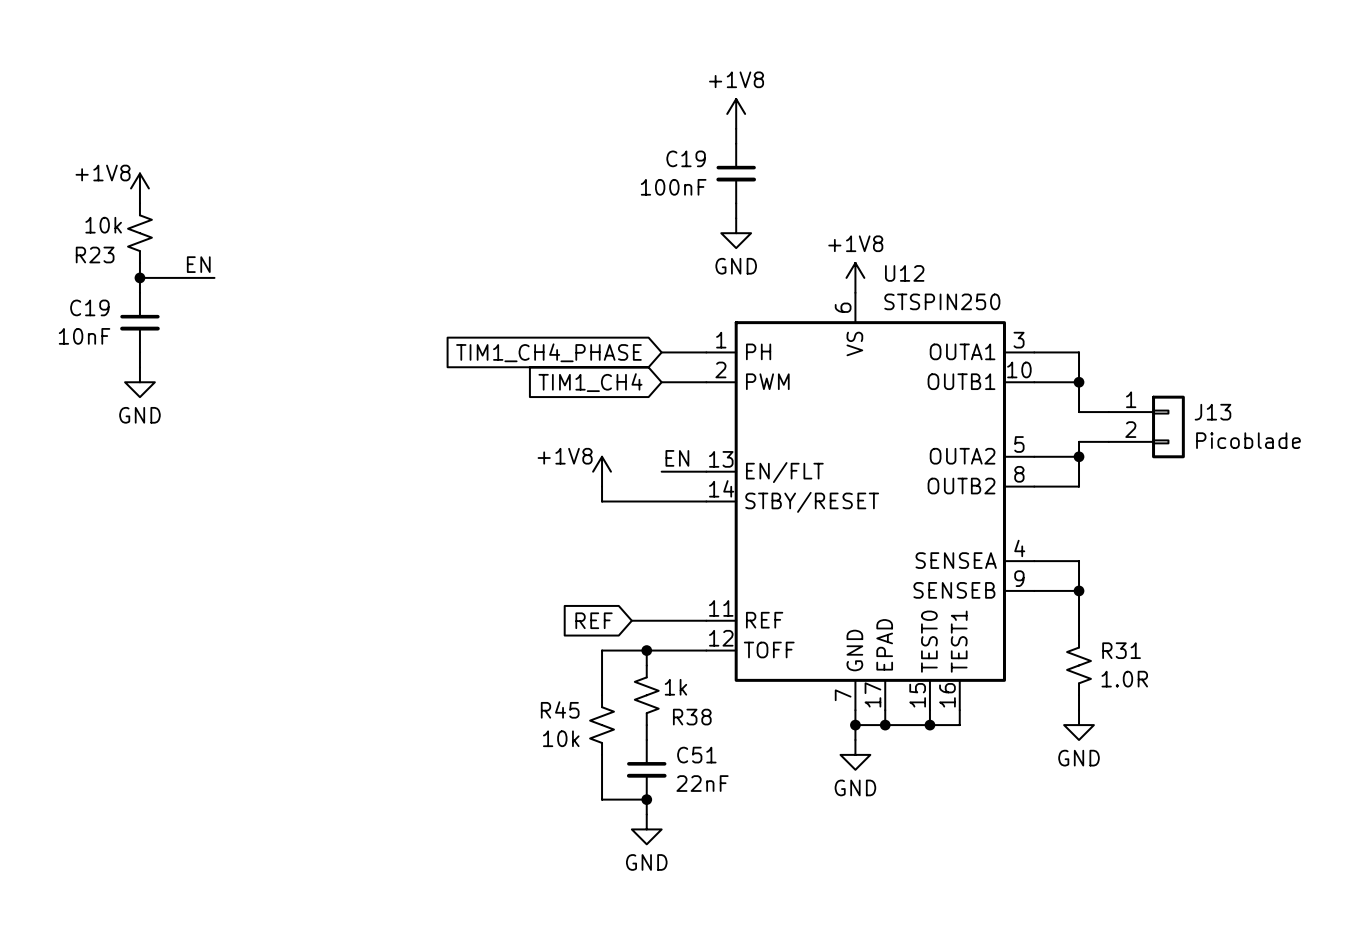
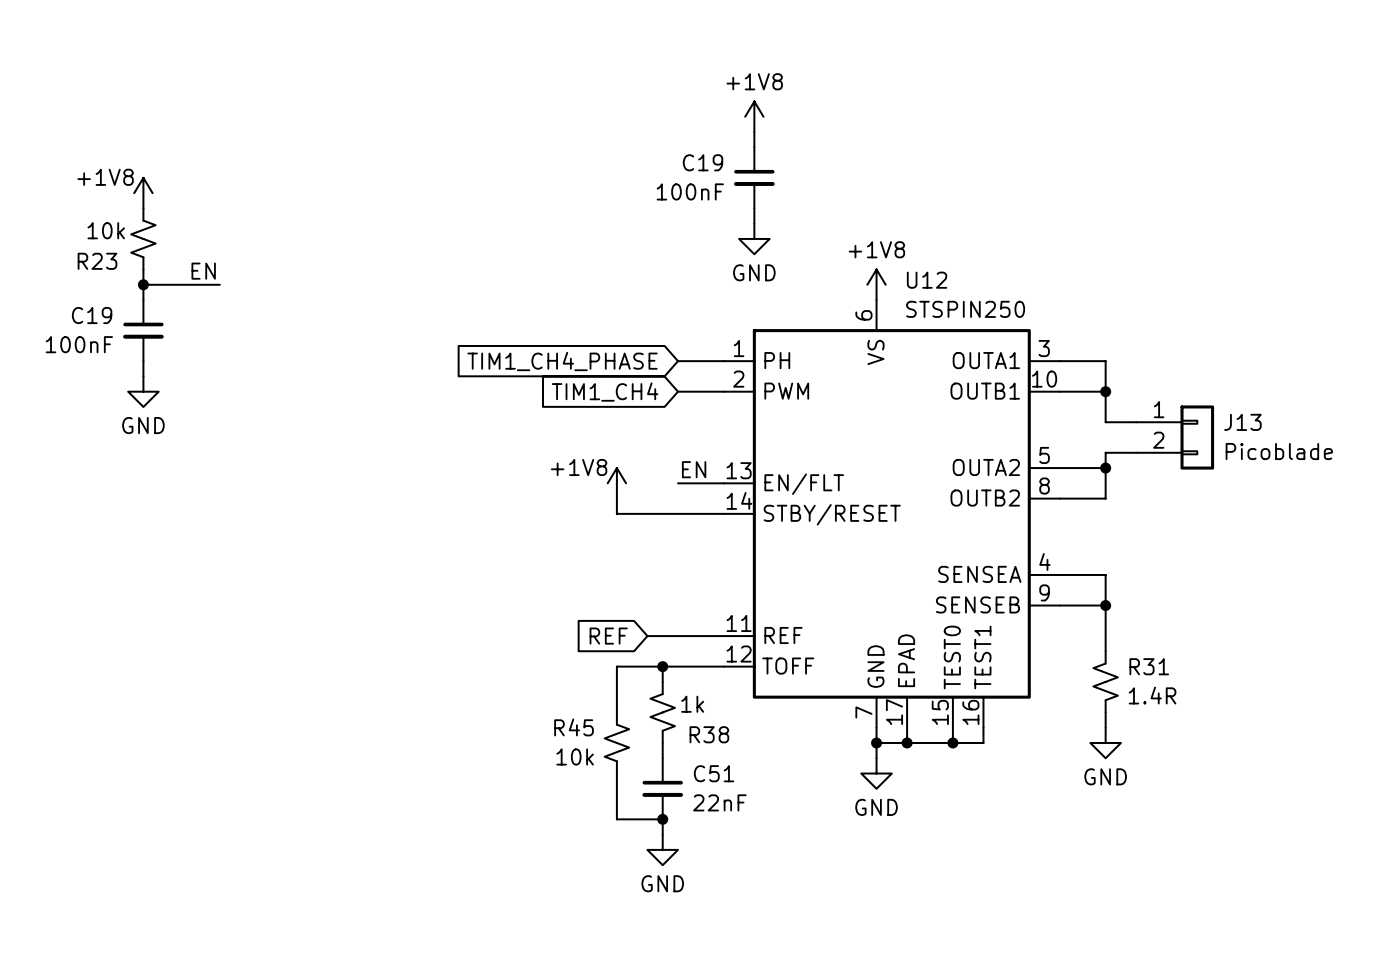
C19 value: 10nF (84, 336) -> 100nF (79, 344)
R31 value: 1.0R (1124, 679) -> 1.4R (1152, 695)

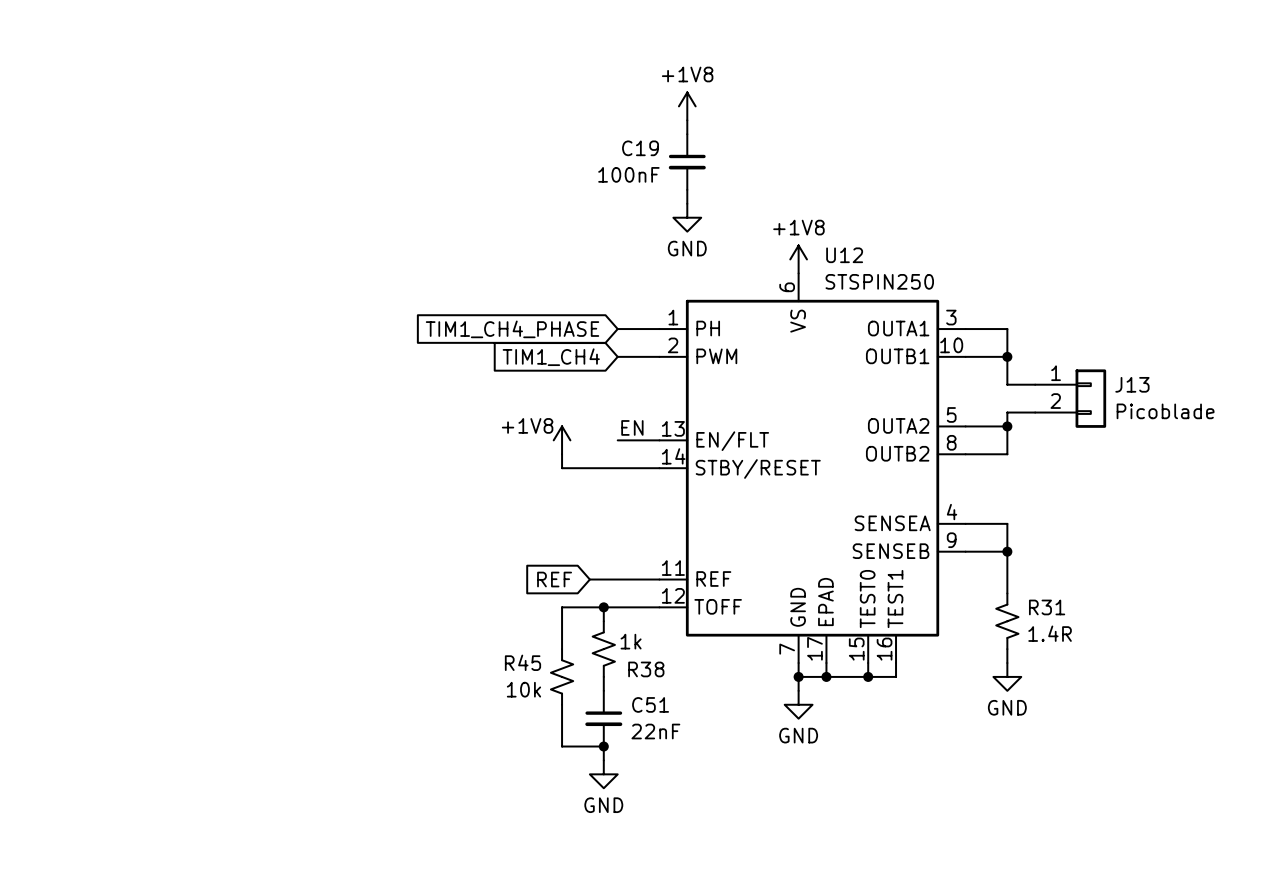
power symbol: +1V8 (143, 193) -> none
R23: 10k (143, 238) -> none
wire: (143, 269) (143, 300) -> none
label: EN (203, 271) -> none
wire: (143, 284) (219, 284) -> none
junction: (143, 284) -> none
C19: 100nF (143, 330) -> none
wire: (143, 361) (143, 376) -> none
power symbol: GND (143, 391) -> none

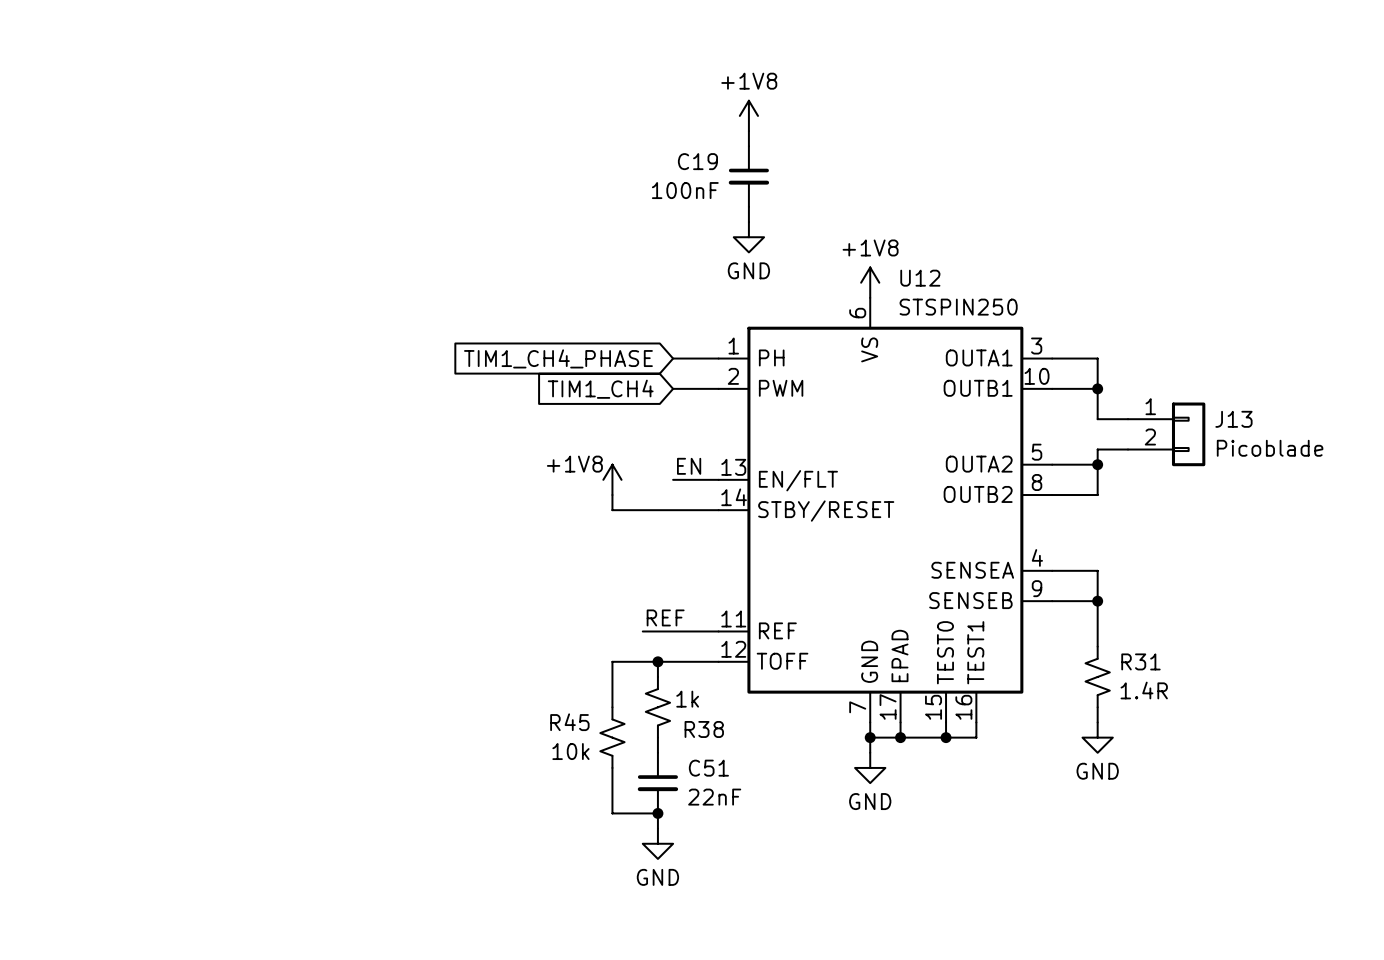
label: none -> REF (665, 617)
global label: REF (554, 579) -> none

